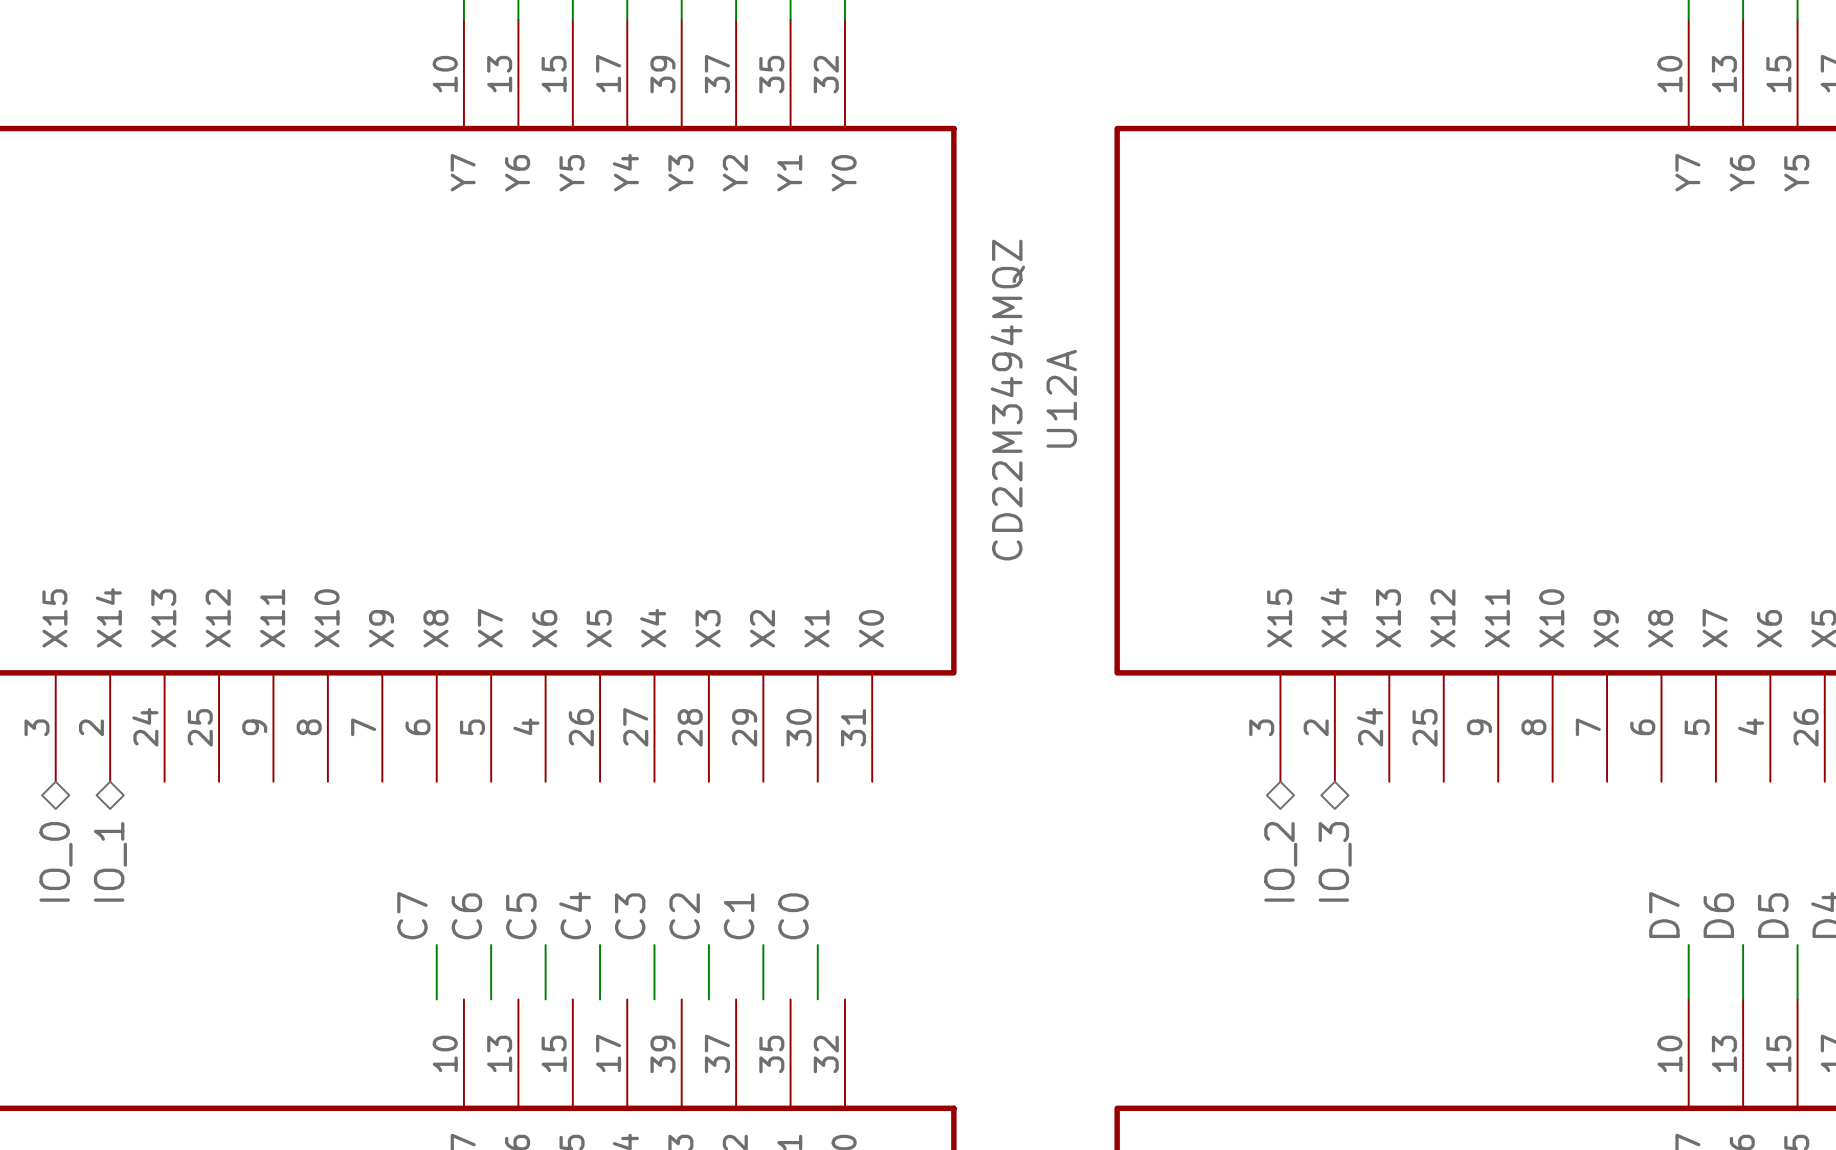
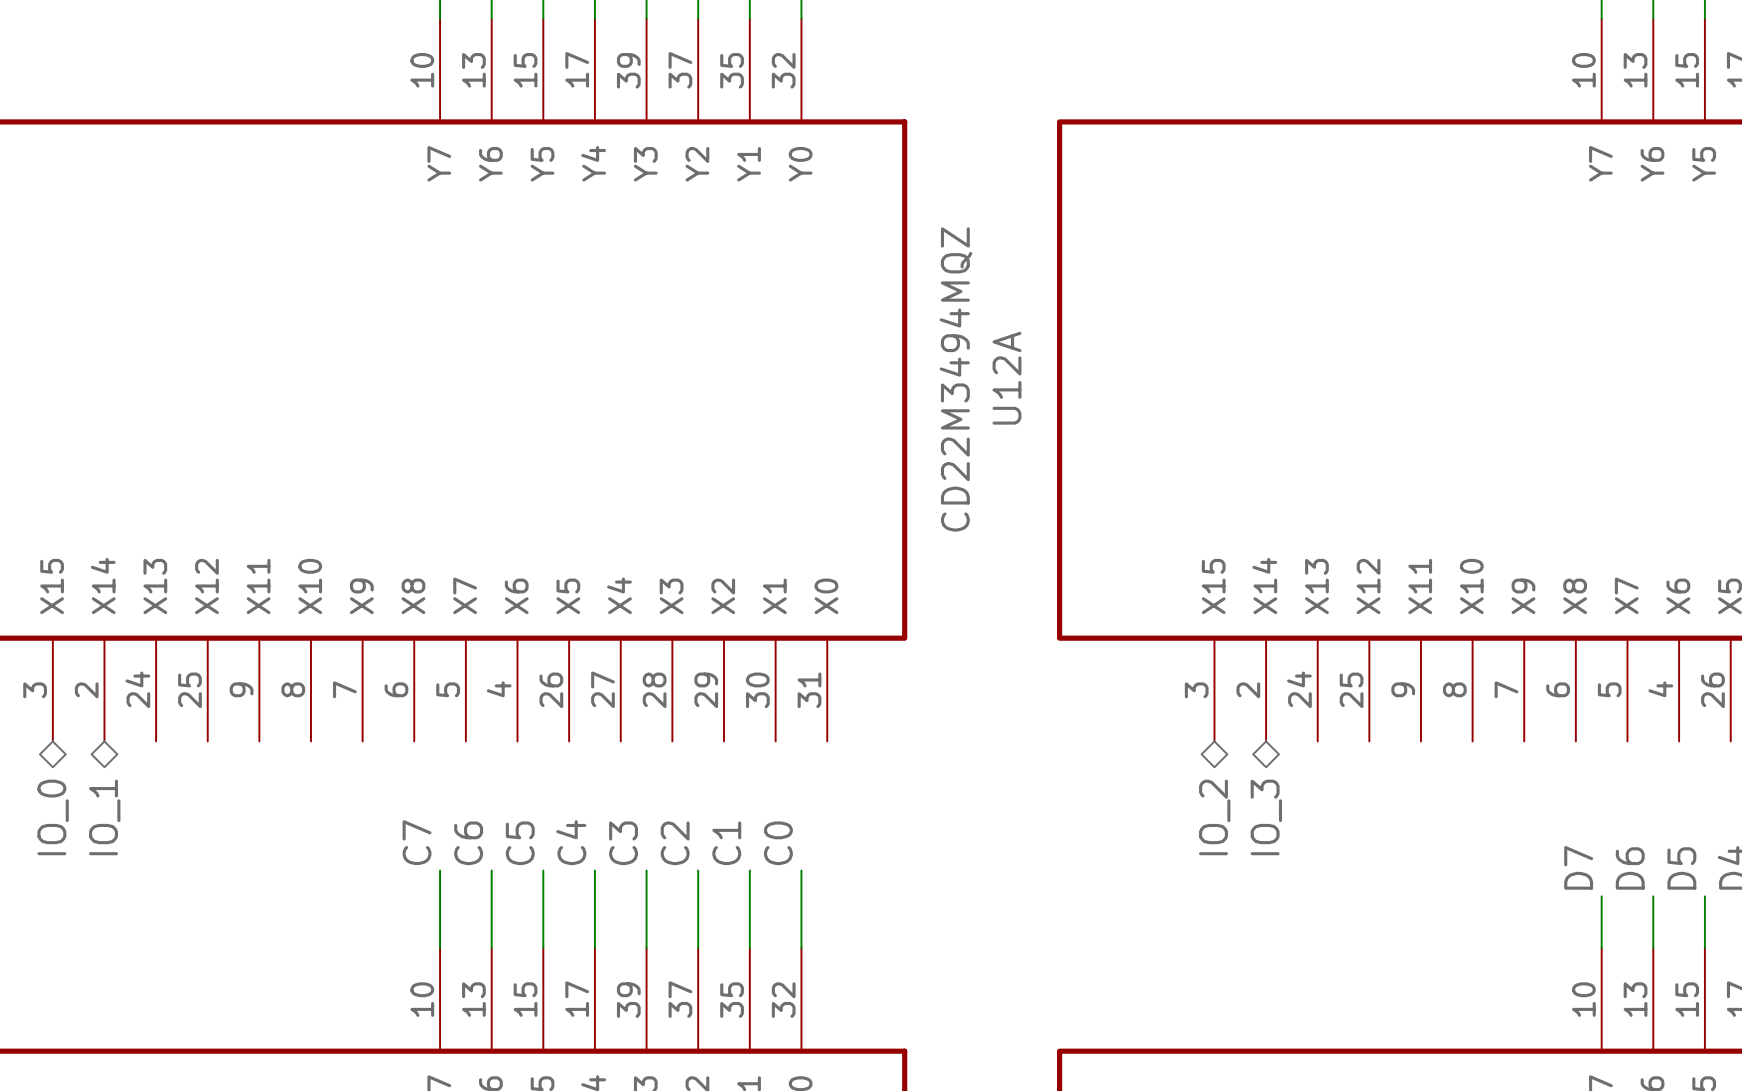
label position: C7 (412, 915) -> C7 (417, 842)
label position: C4 (575, 915) -> C4 (571, 842)
label position: C6 (466, 916) -> C6 (468, 843)
label position: C5 (521, 916) -> C5 (520, 843)
label position: C3 (630, 916) -> C3 (623, 843)
label position: C2 (684, 916) -> C2 (675, 843)
label position: C1 (739, 916) -> C1 (726, 843)
label position: C0 (793, 916) -> C0 (778, 843)
wire: none -> (440, 870) (440, 947)
wire: none -> (491, 870) (491, 947)
wire: none -> (543, 870) (543, 947)
wire: none -> (594, 870) (594, 947)
wire: none -> (646, 870) (646, 947)
wire: none -> (698, 870) (698, 947)
wire: none -> (749, 870) (749, 947)
wire: none -> (801, 870) (801, 947)
wire: (436, 945) (436, 999) -> none
wire: (491, 945) (491, 999) -> none
wire: (545, 945) (545, 999) -> none
wire: (600, 945) (600, 999) -> none
wire: (654, 945) (654, 999) -> none
wire: (708, 945) (708, 999) -> none
wire: (763, 945) (763, 999) -> none
wire: (817, 945) (817, 999) -> none

